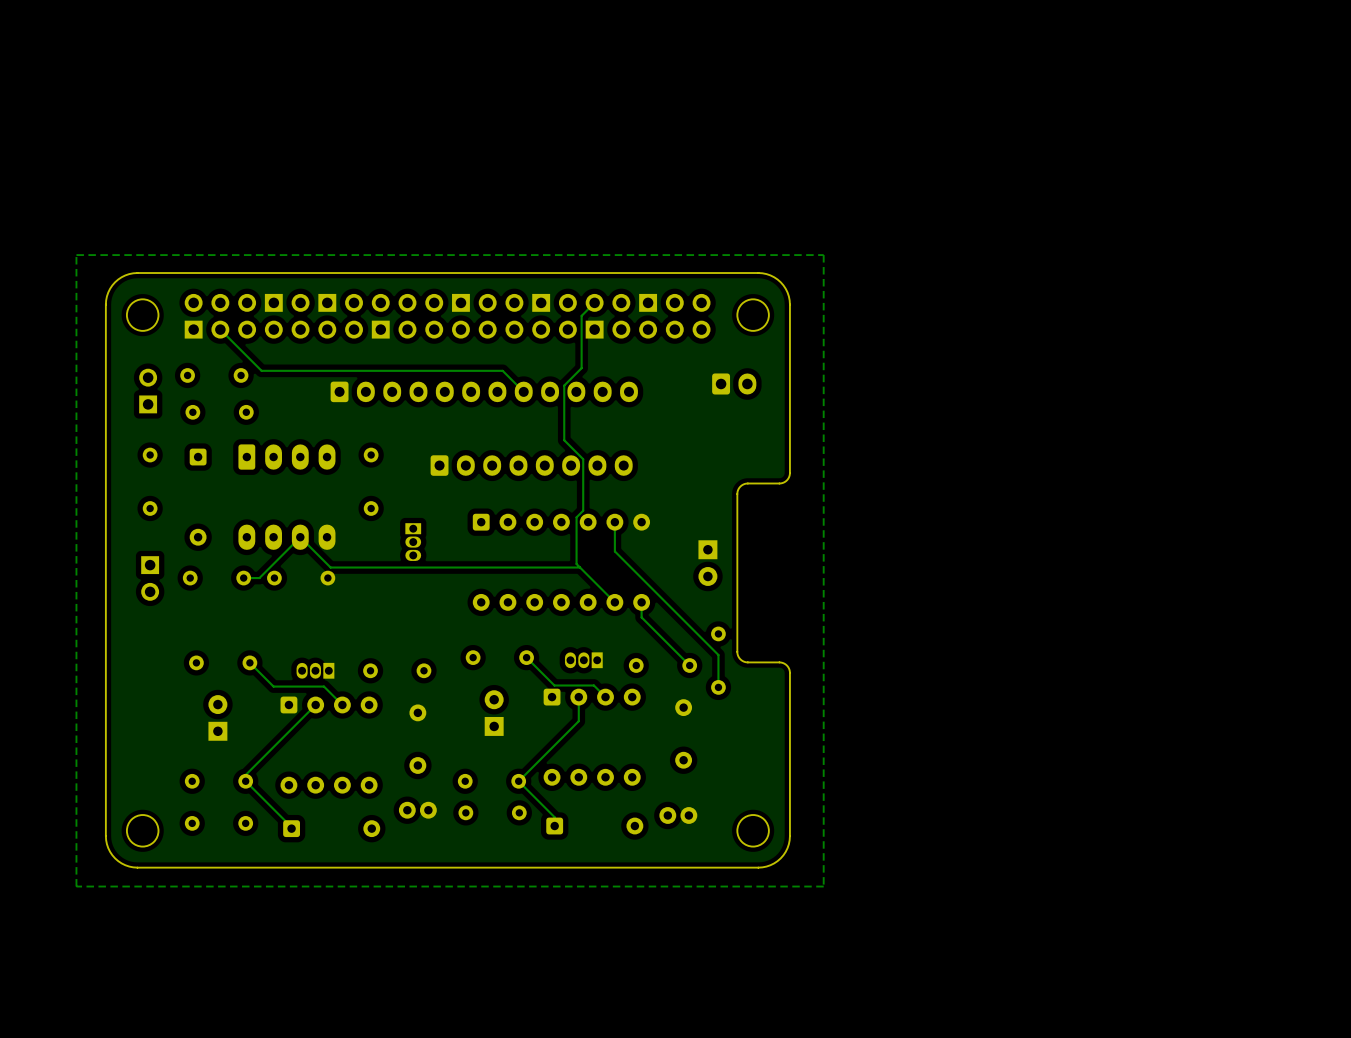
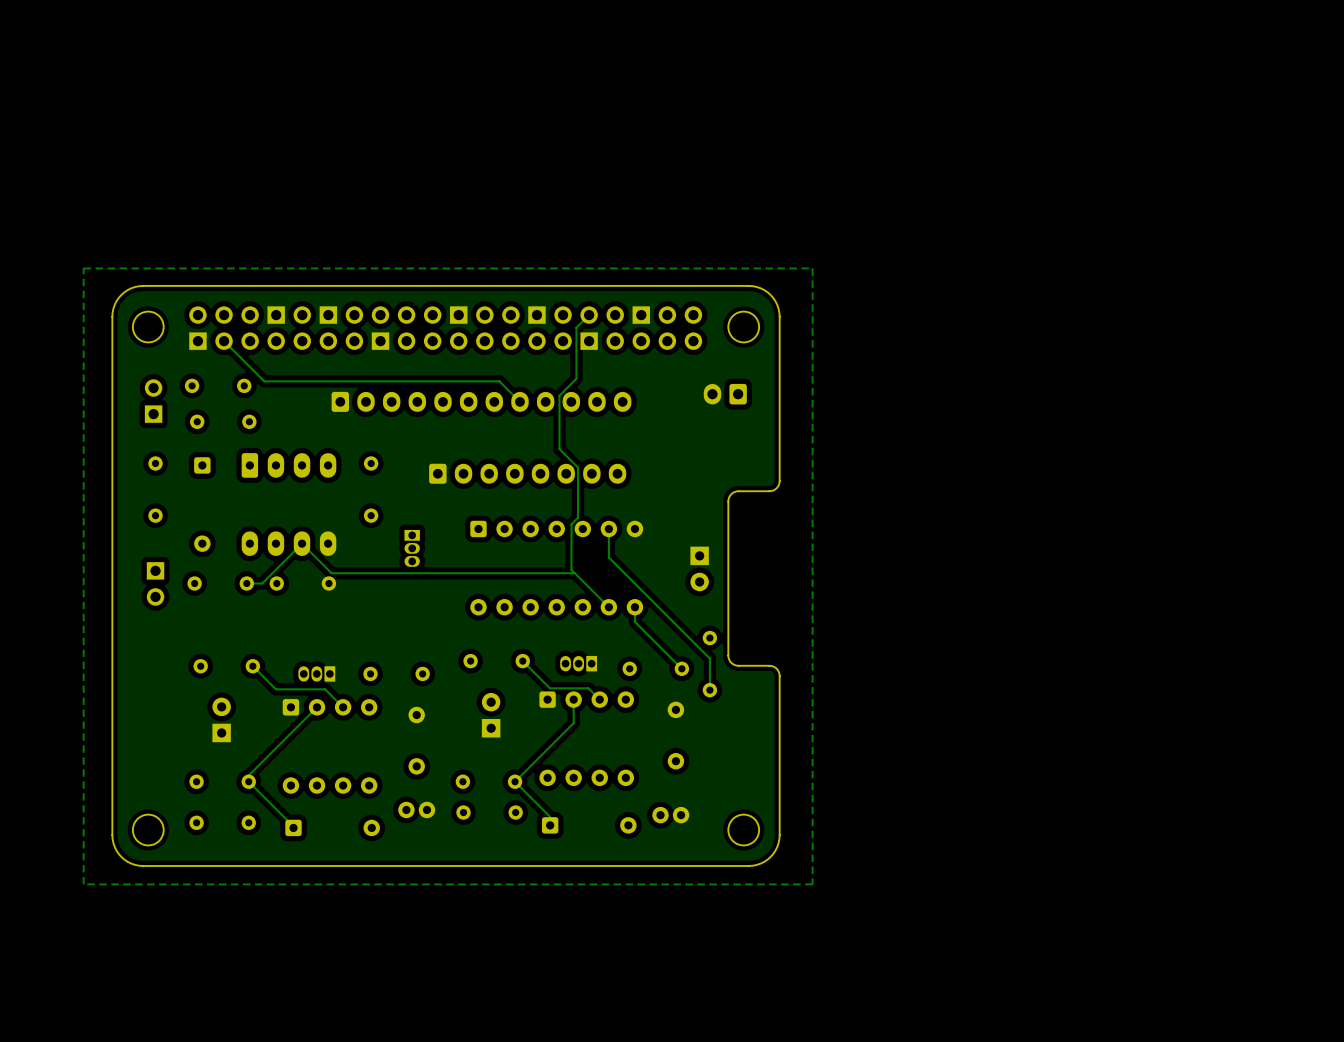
part rotation: 0° (734, 383) -> 180° (725, 394)

